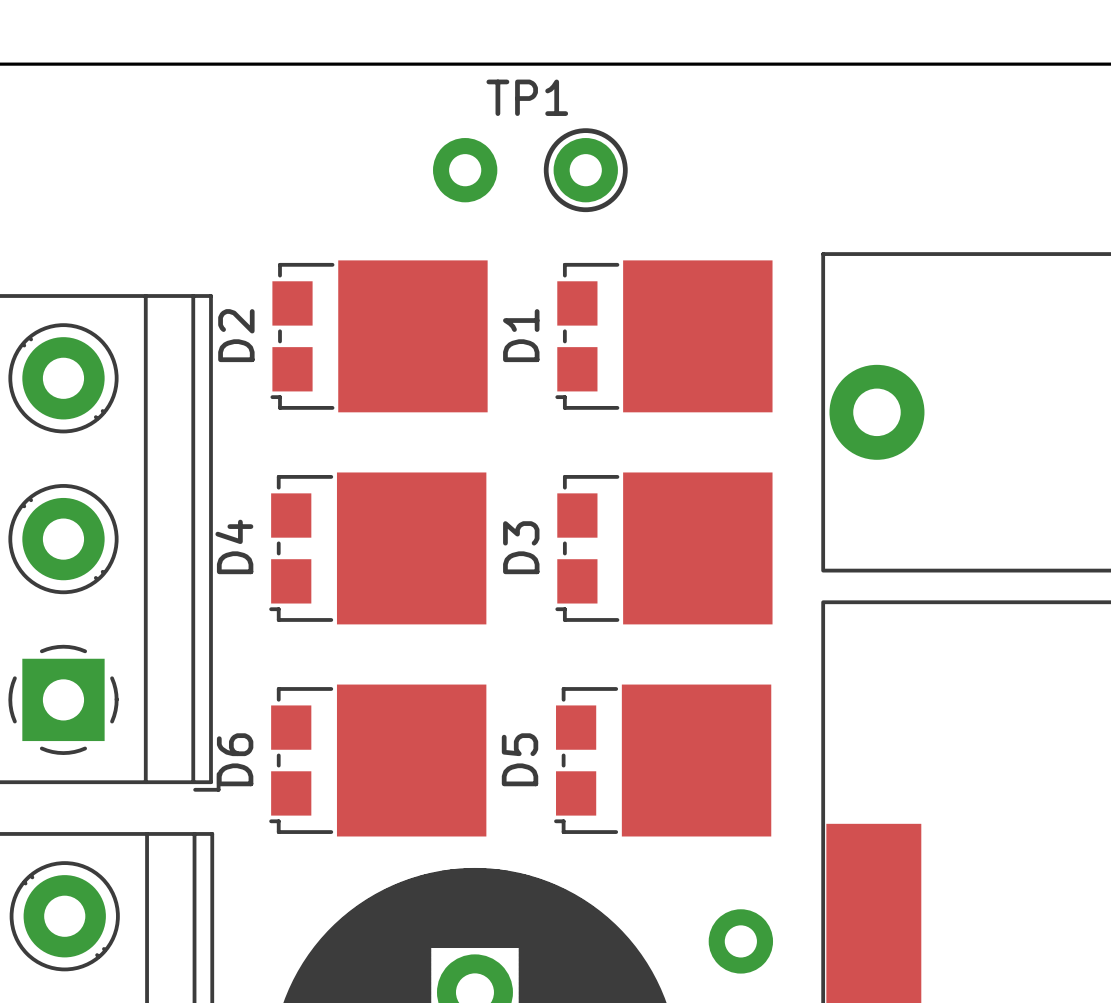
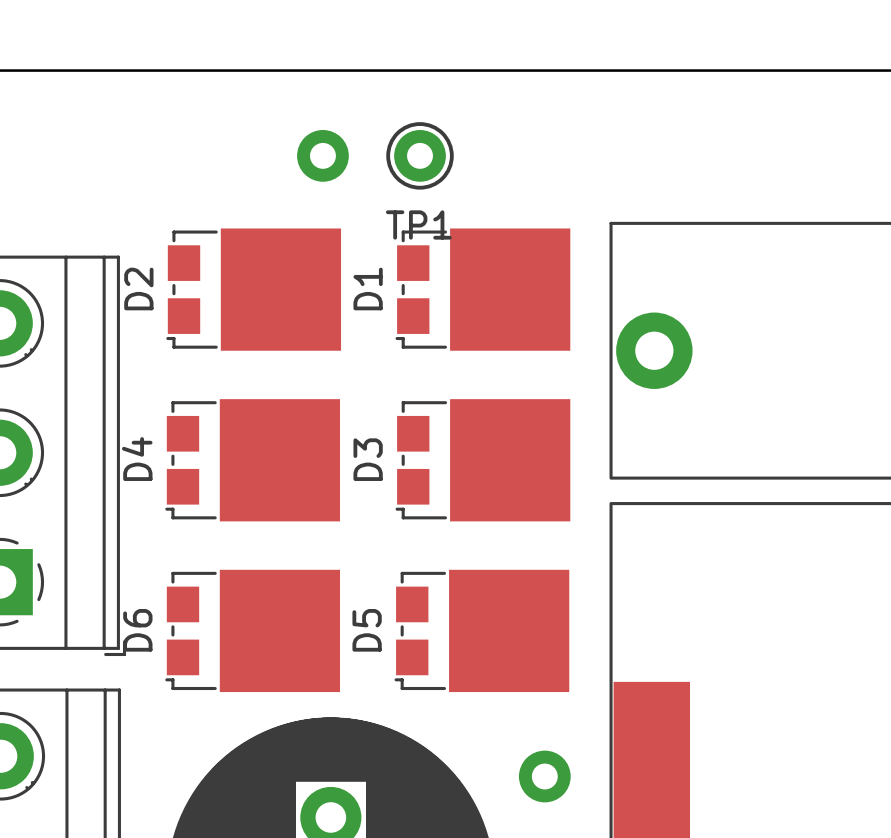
TP1 name position: TP1 (527, 97) -> TP1 (418, 224)

